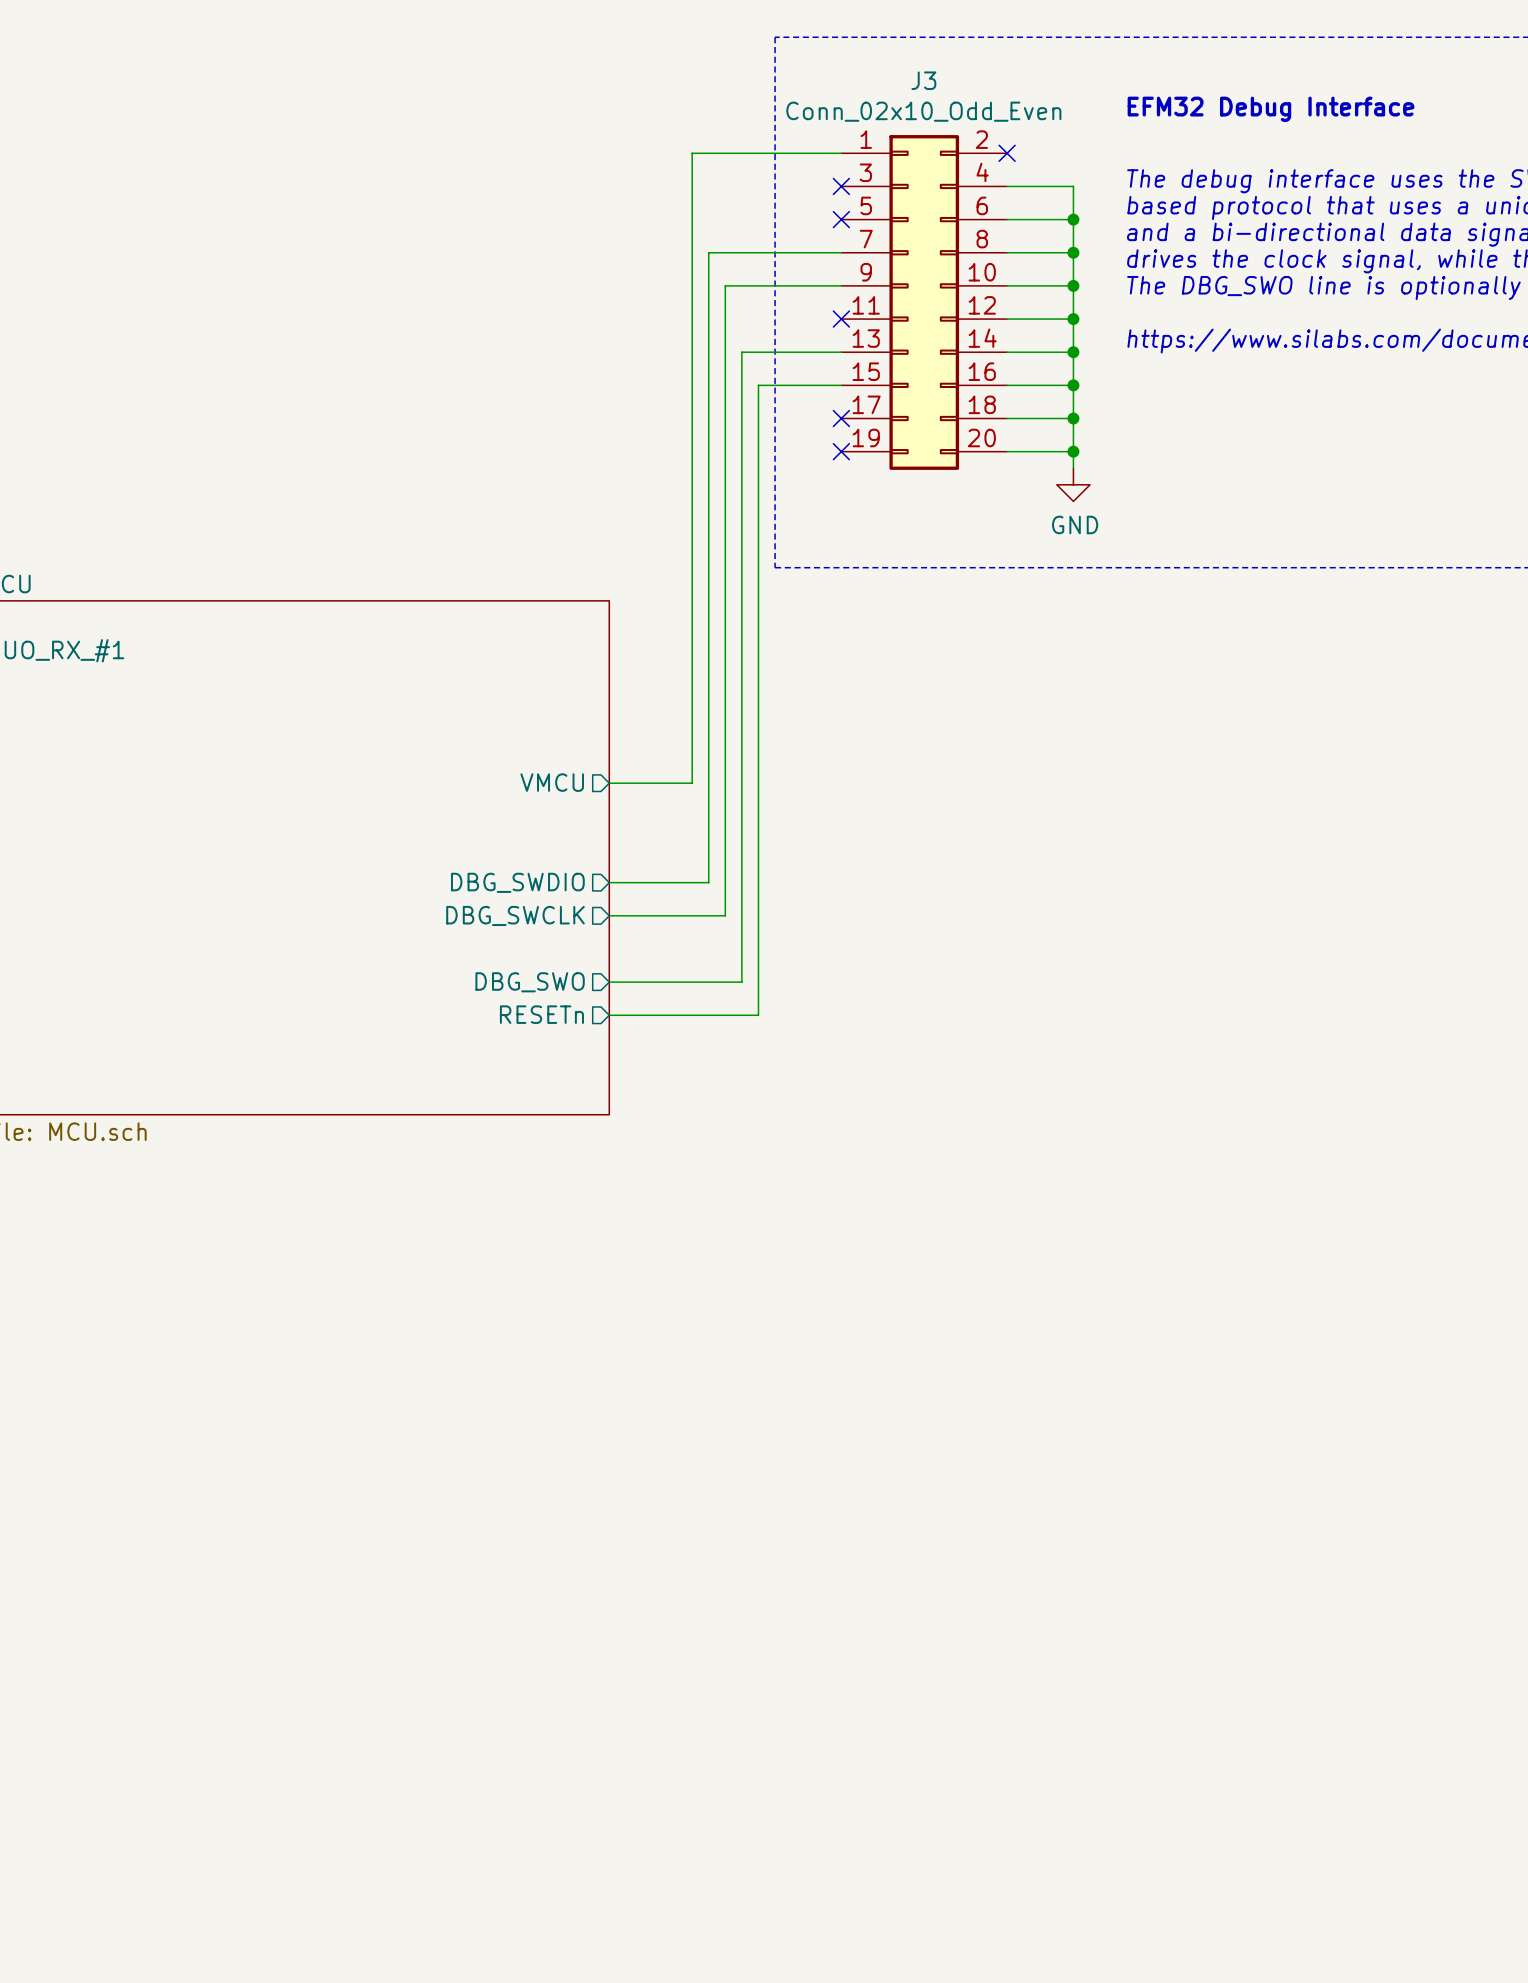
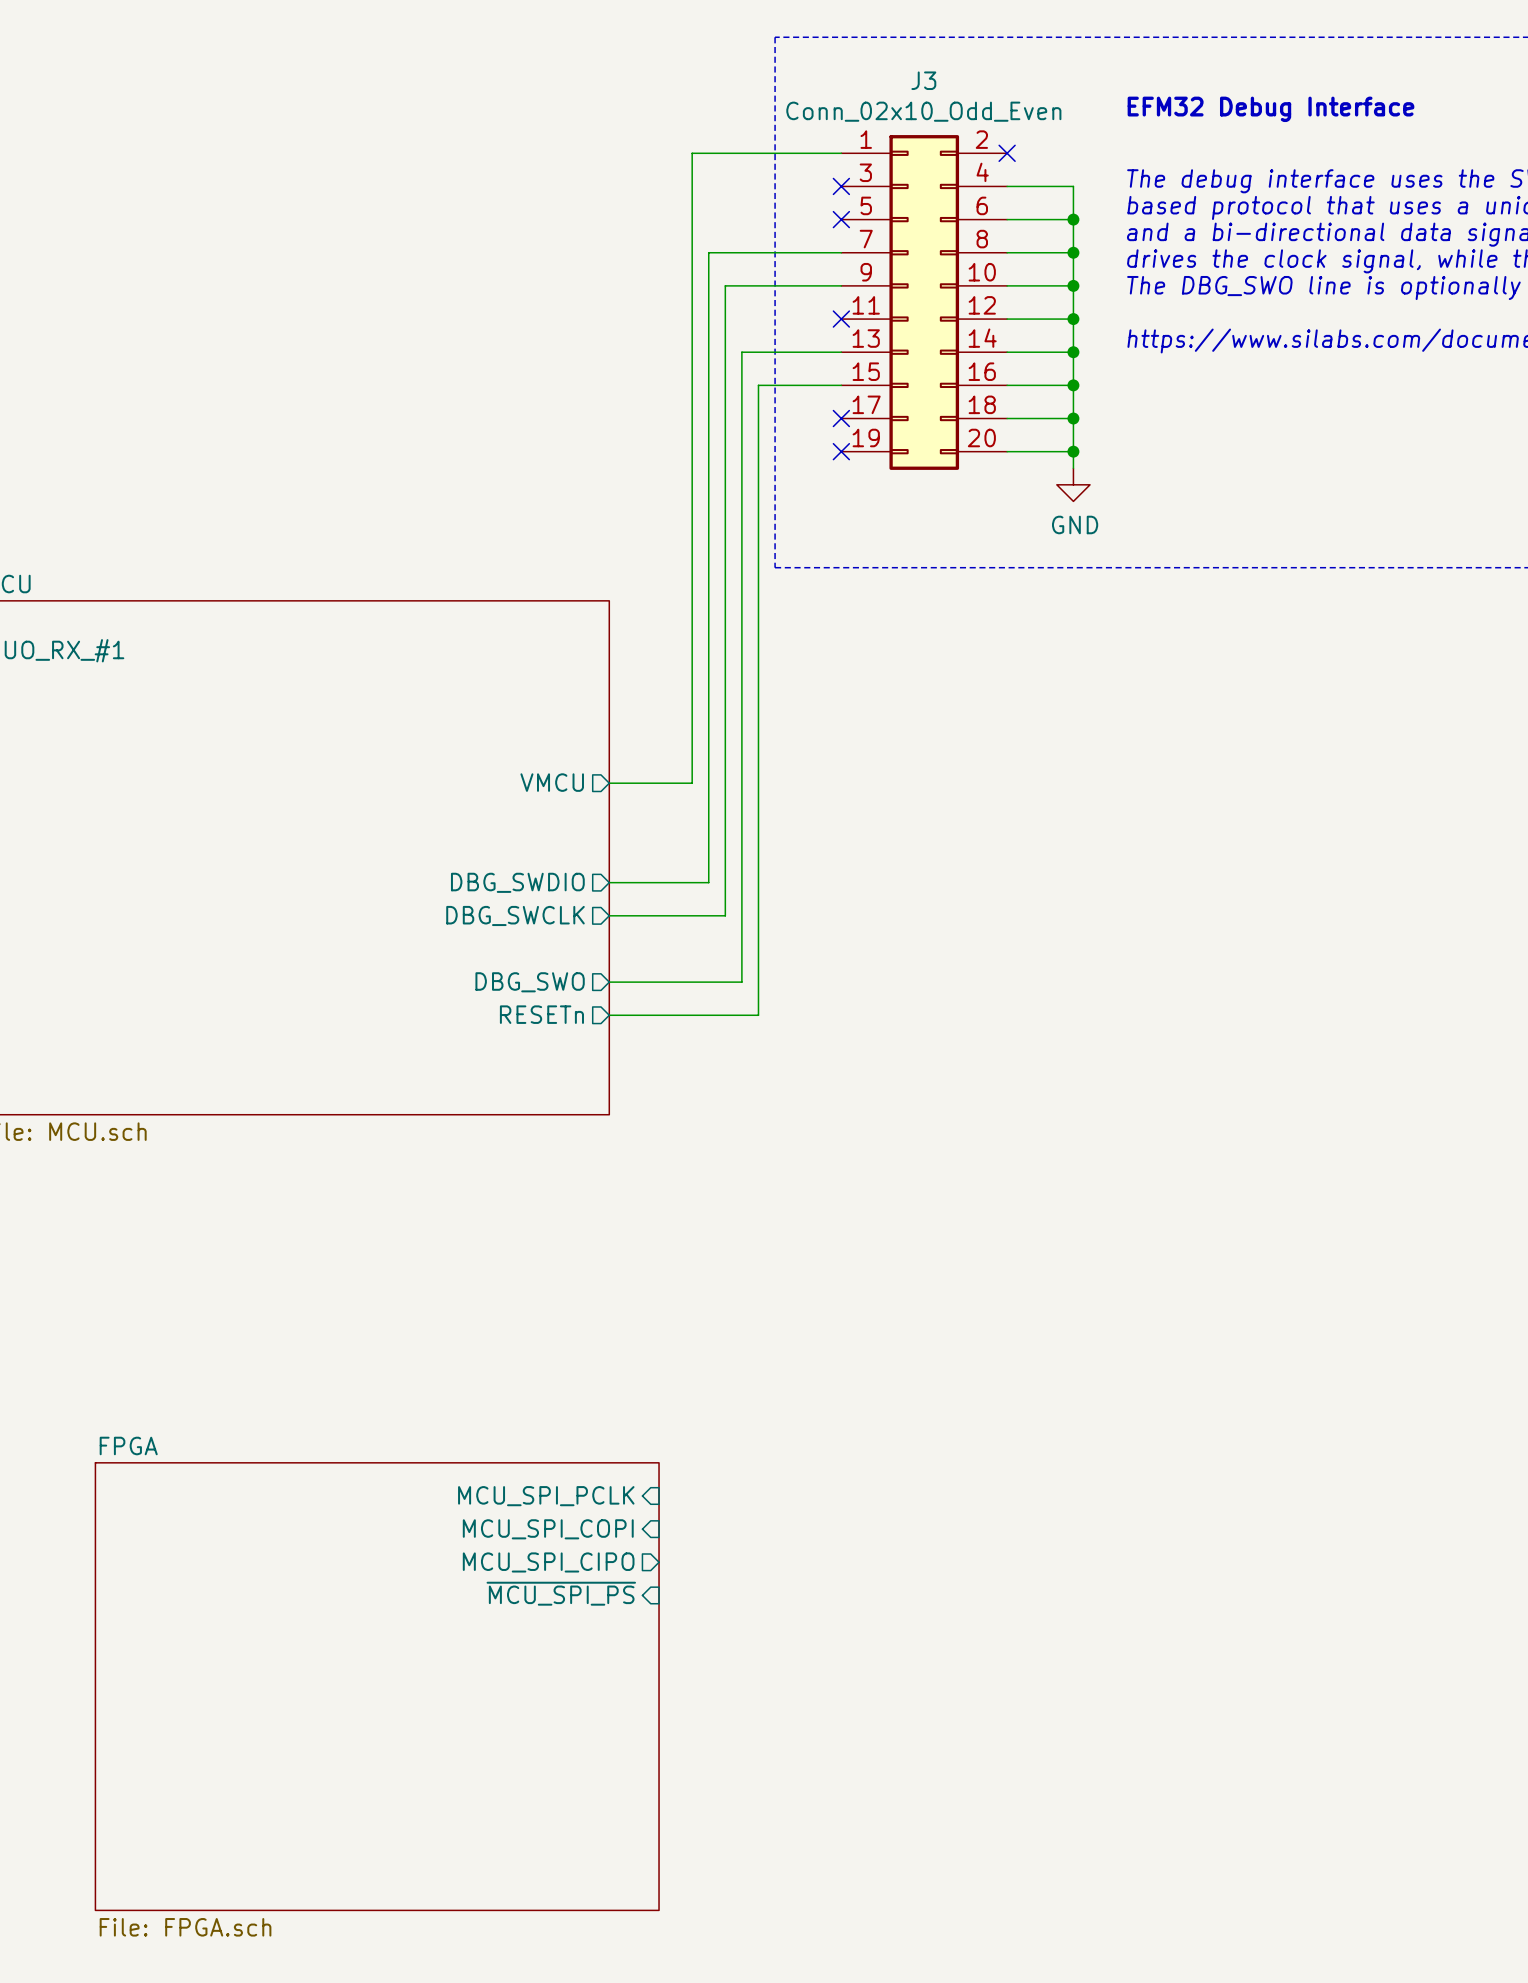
sheet pin: none -> MCU_SPI_PCLK (546, 1496)
sheet pin: none -> MCU_SPI_COPI (548, 1529)
sheet pin: none -> MCU_SPI_CIPO (548, 1562)
sheet pin: none -> ~{MCU_SPI_PS} (561, 1593)
sheet FPGA: none -> File: FPGA.sch (377, 1686)

